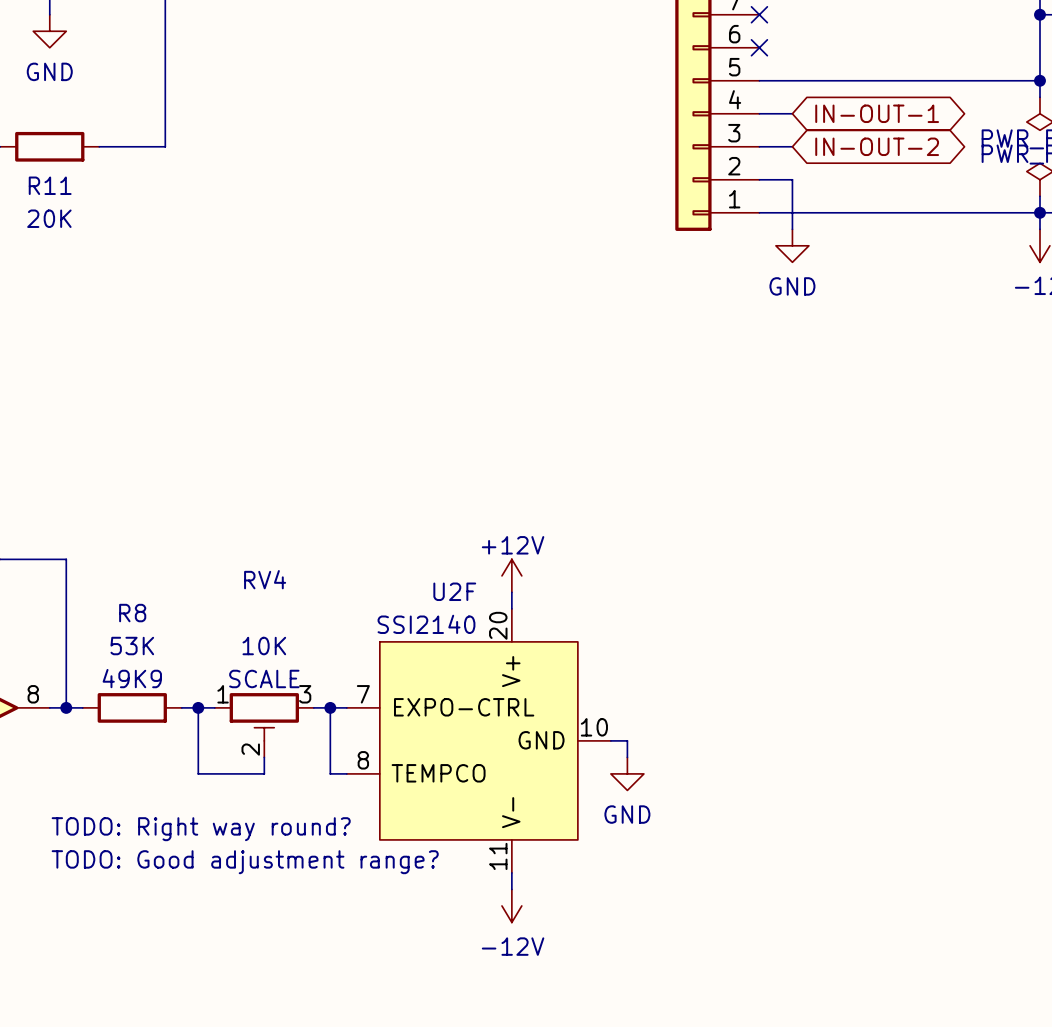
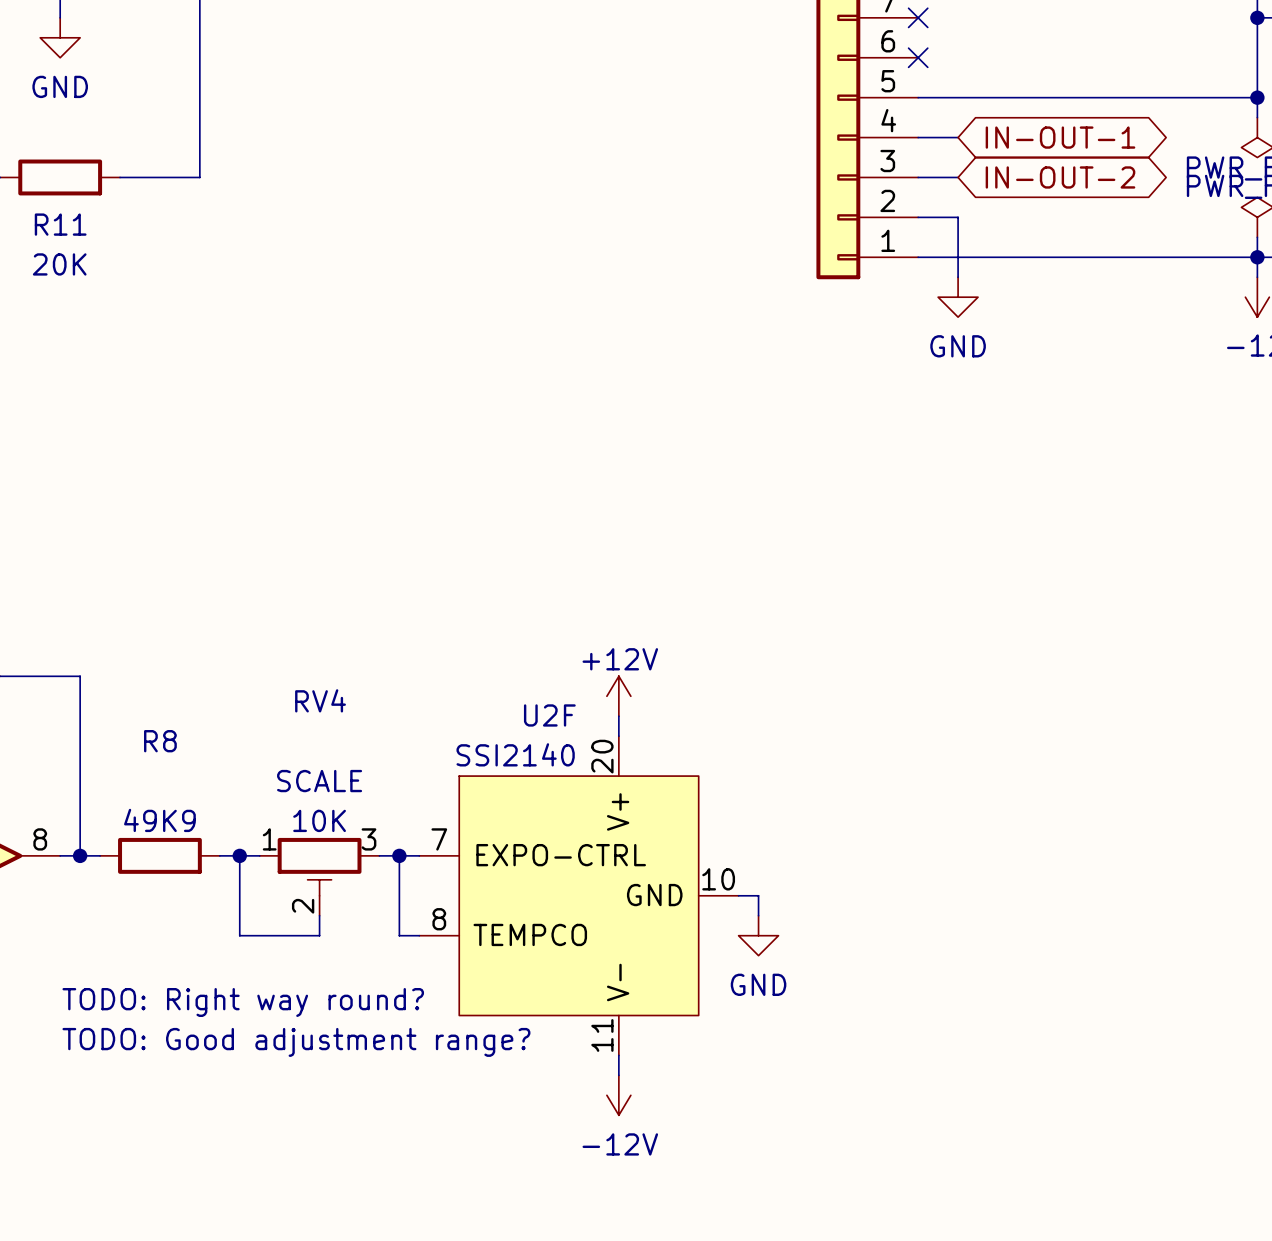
R8 value: 53K (132, 646) -> none
RV4 text position: 10K (264, 646) -> 10K (319, 820)
RV4 text position: SCALE (264, 678) -> SCALE (319, 781)

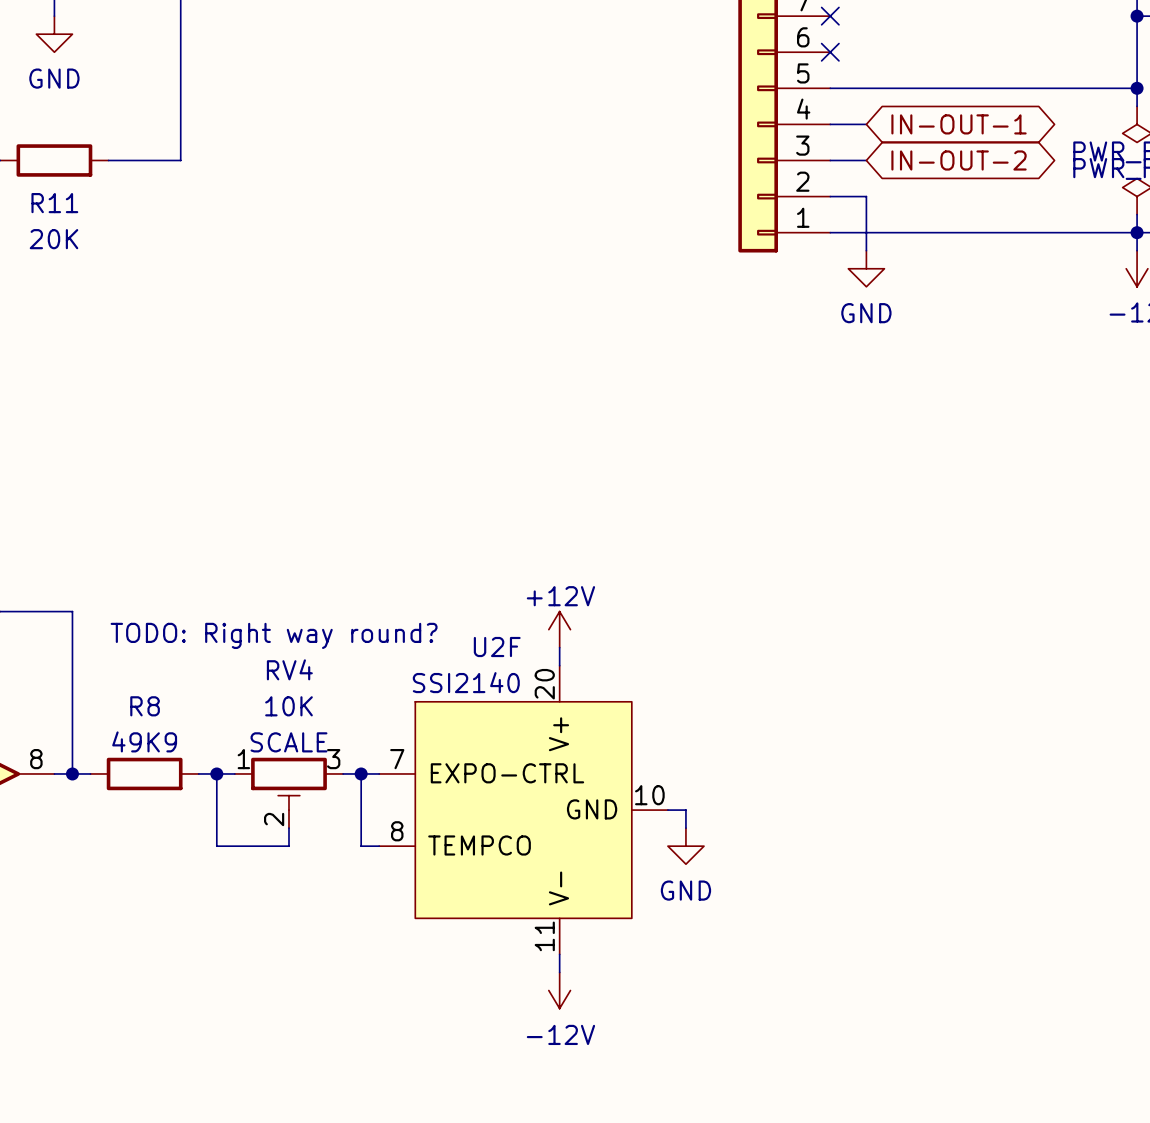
RV4 name position: RV4 (320, 700) -> RV4 (289, 669)
R8 name position: R8 (160, 741) -> R8 (145, 706)
RV4 text position: SCALE (319, 781) -> SCALE (288, 742)
RV4 value: none -> 10K (288, 706)
RV4 text: 10K (319, 820) -> none
text position: TODO: Right way round? (243, 1002) -> TODO: Right way round? (274, 635)
text: TODO: Good adjustment range? (296, 1042) -> none

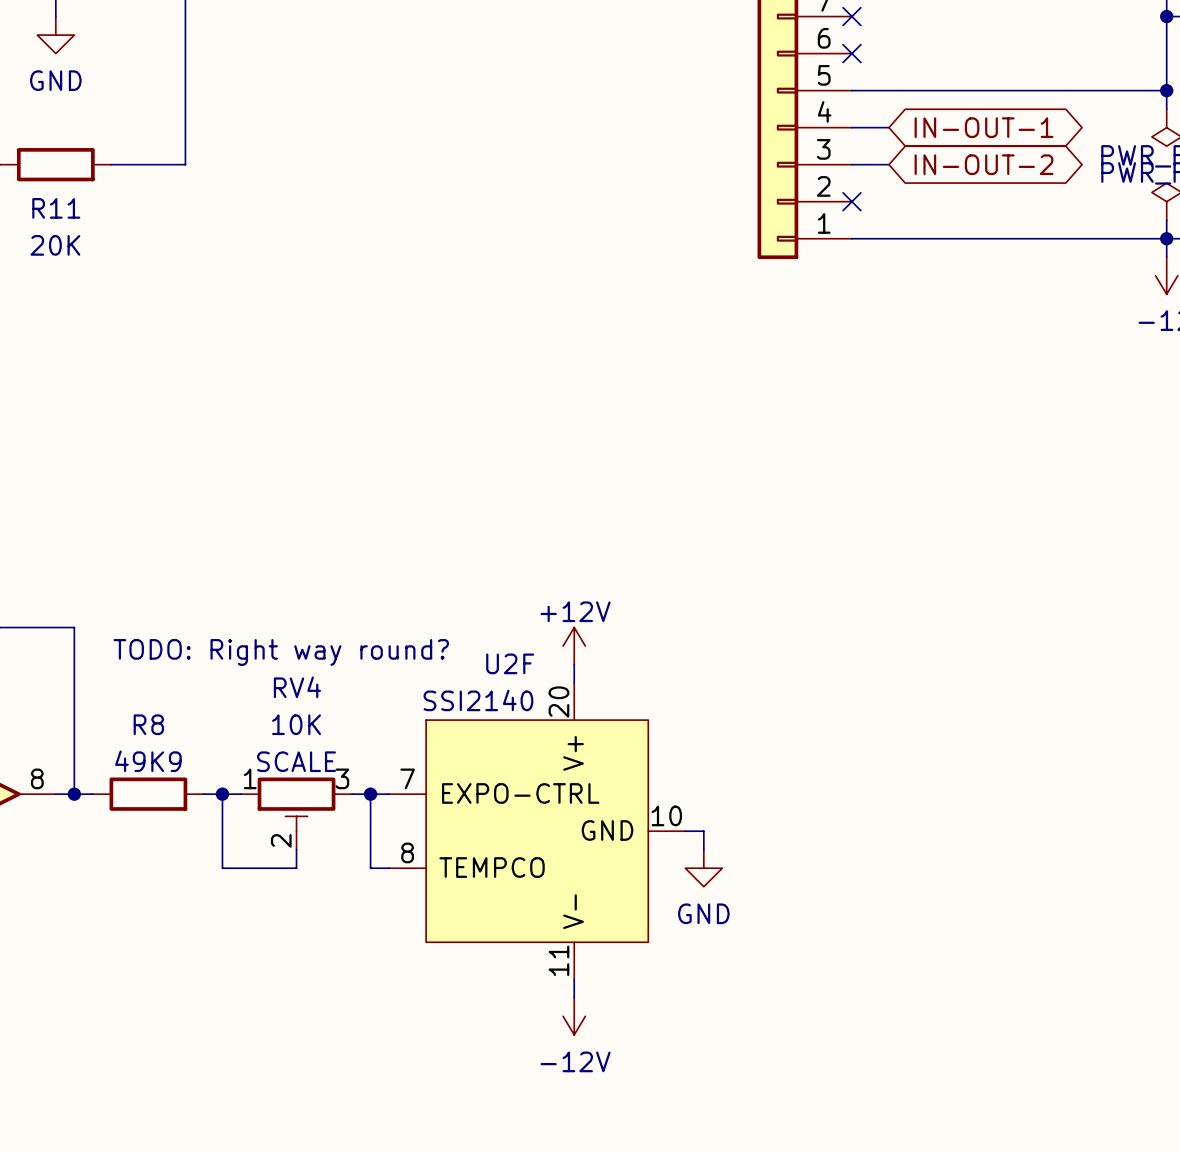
wire: (830, 196) (866, 196) (866, 250) -> none
no-connect mark: none -> (851, 201)
power symbol: GND (866, 268) -> none

